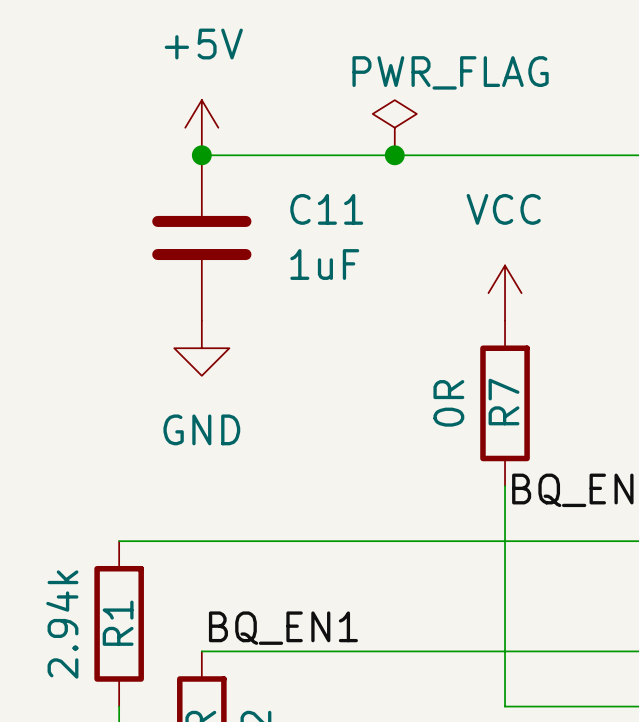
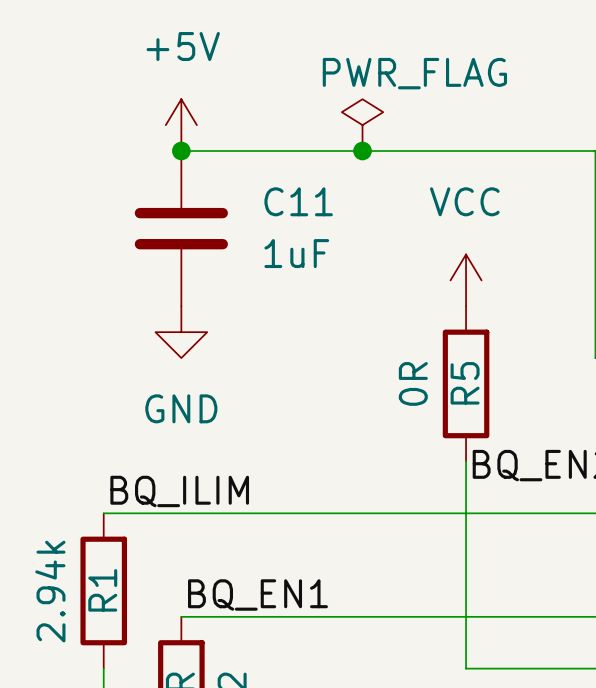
R7 name: R7 (503, 402) -> R5 (465, 383)
label: none -> BQ_ILIM (179, 491)

